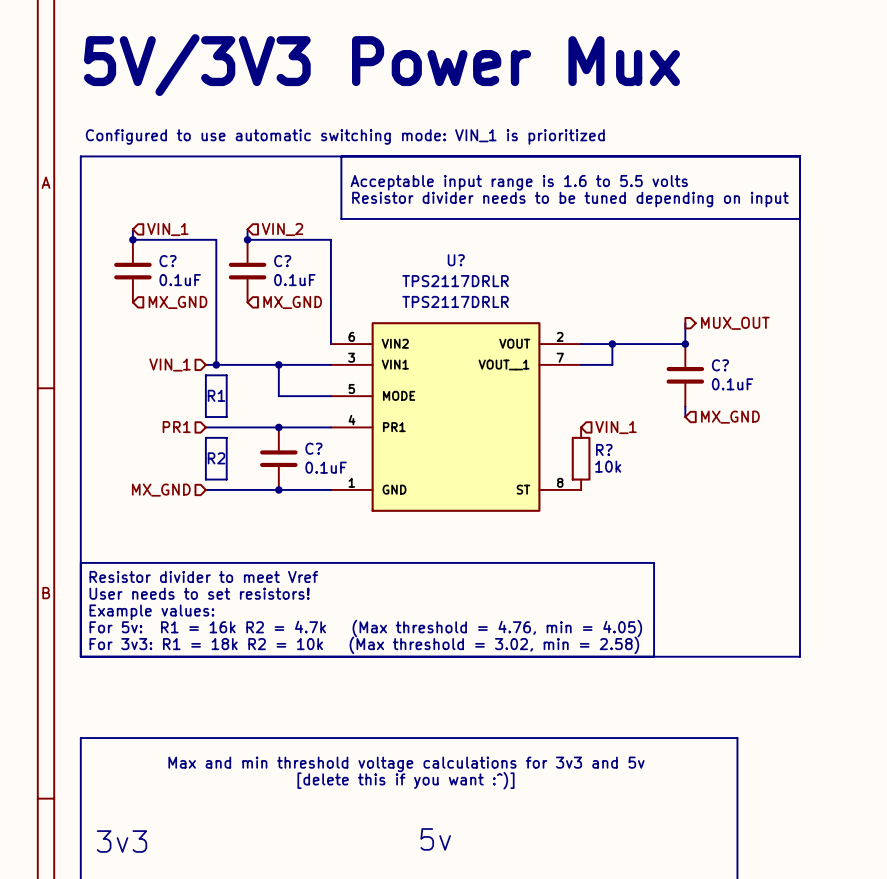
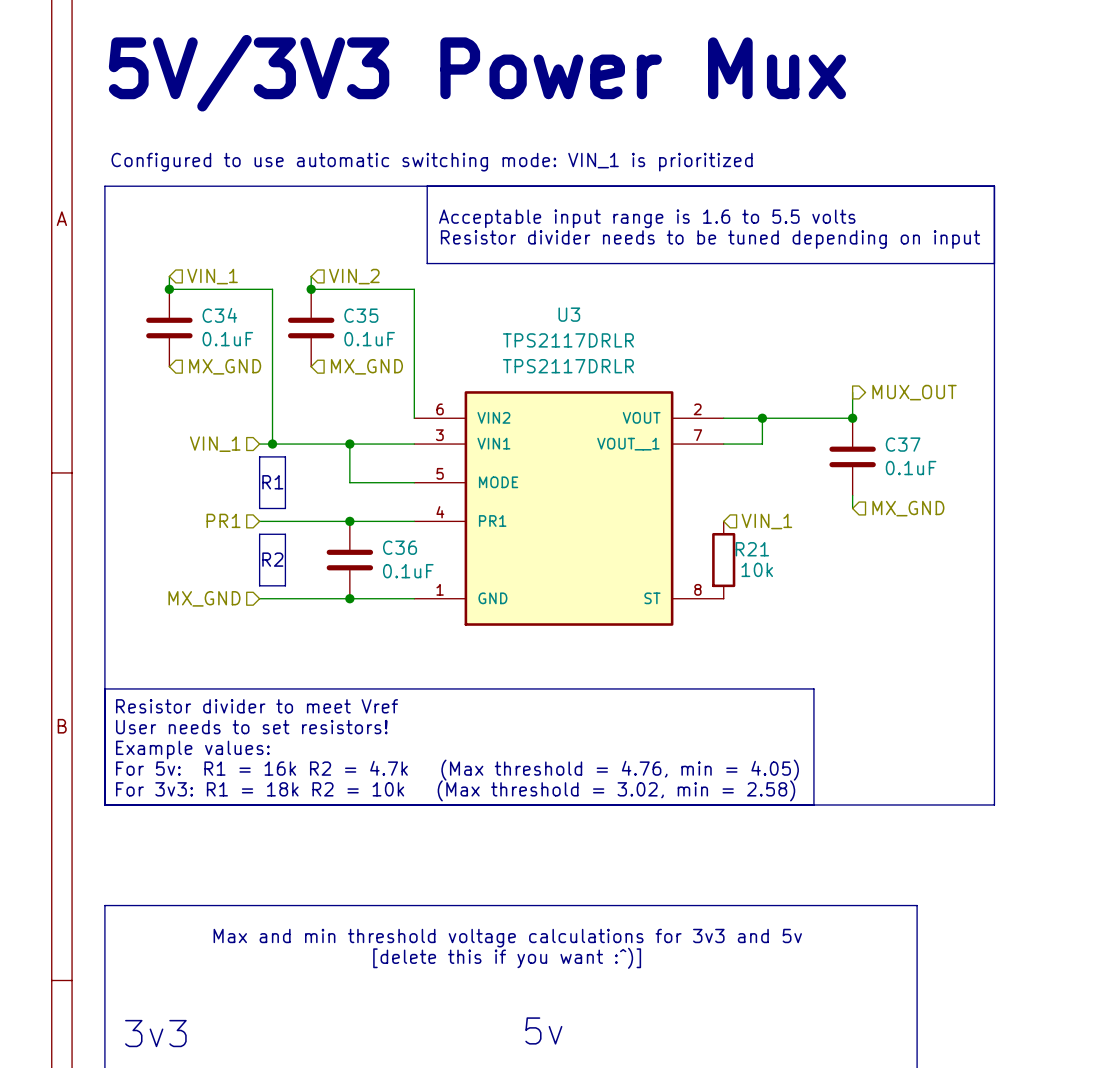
U? name: U? (456, 260) -> U3 (569, 314)
C? name: C? (168, 261) -> C34 (219, 315)
C? name: C? (282, 261) -> C35 (361, 315)
C? name: C? (720, 365) -> C37 (903, 444)
C? name: C? (313, 448) -> C36 (400, 547)
R? name: R? (604, 449) -> R21 (752, 549)

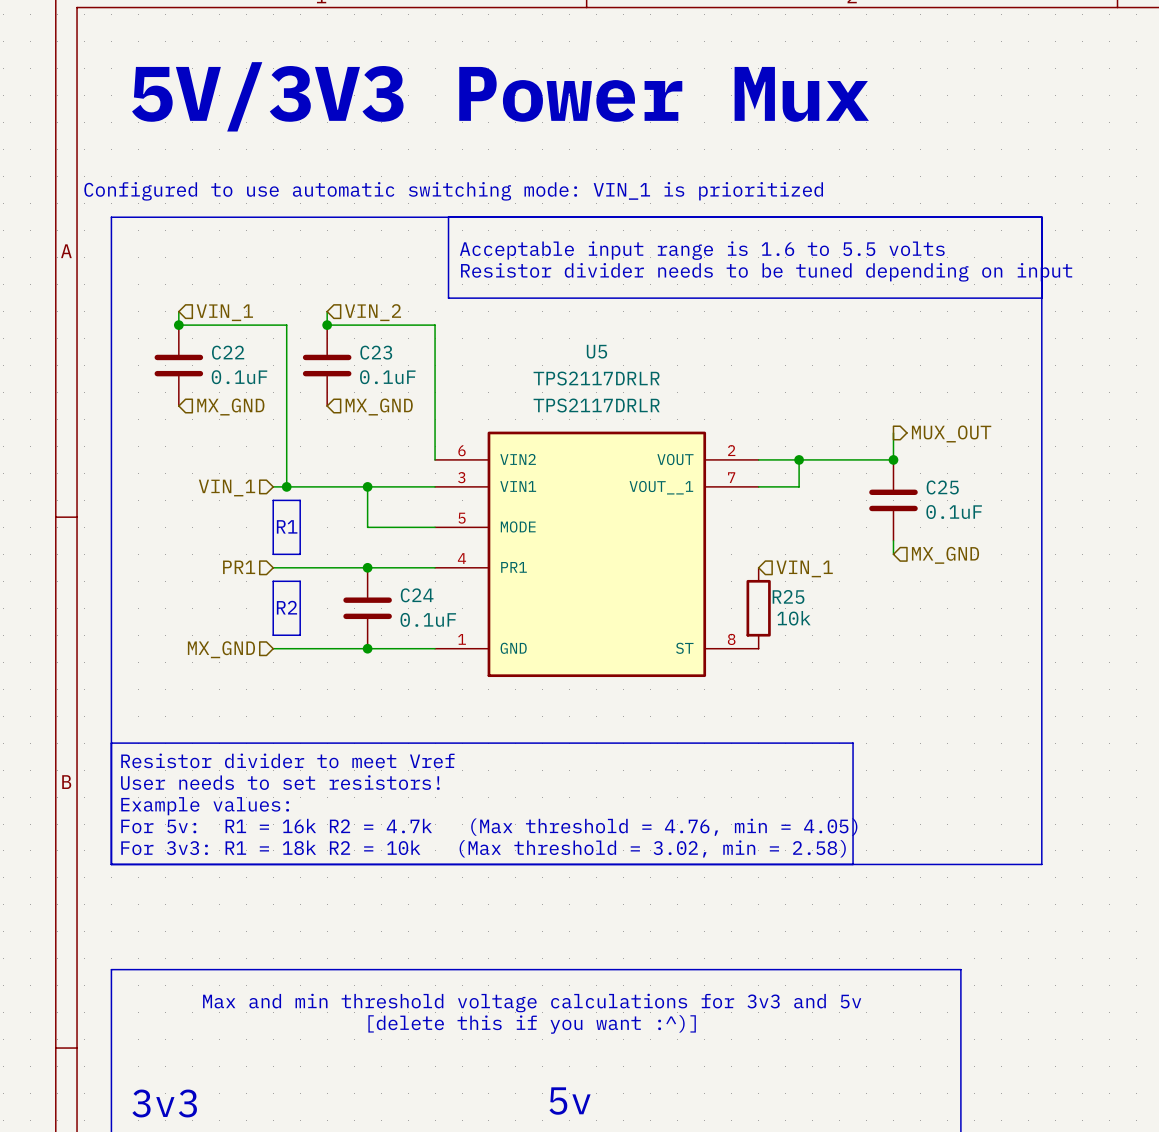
U3 name: U3 (569, 314) -> U5 (596, 351)
C34 name: C34 (219, 315) -> C22 (228, 352)
C35 name: C35 (361, 315) -> C23 (376, 352)
C37 name: C37 (903, 444) -> C25 (942, 487)
C36 name: C36 (400, 547) -> C24 (417, 595)
R21 name: R21 (752, 549) -> R25 (788, 596)

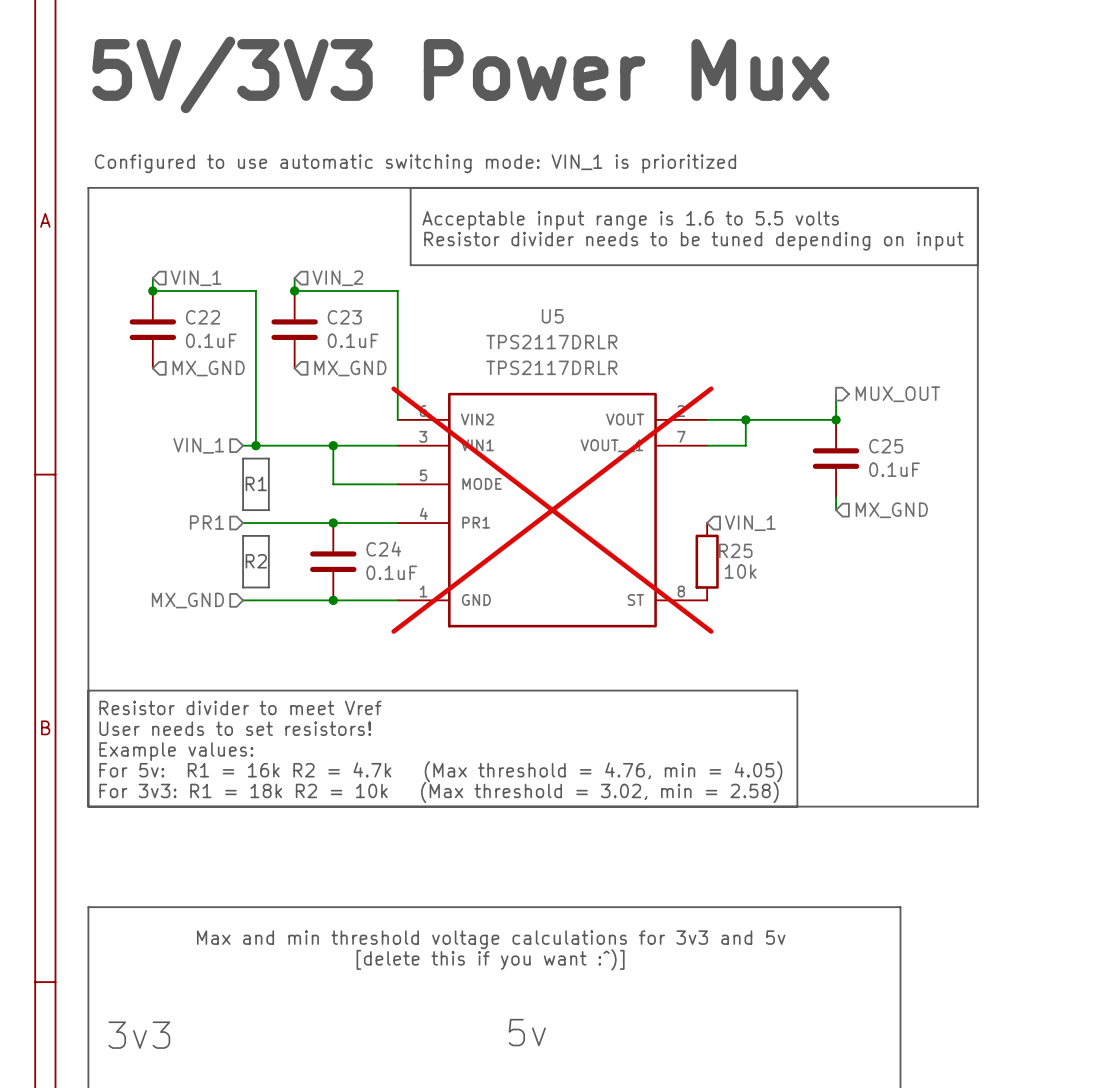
U5 do-not-place cross: none -> (552, 510)

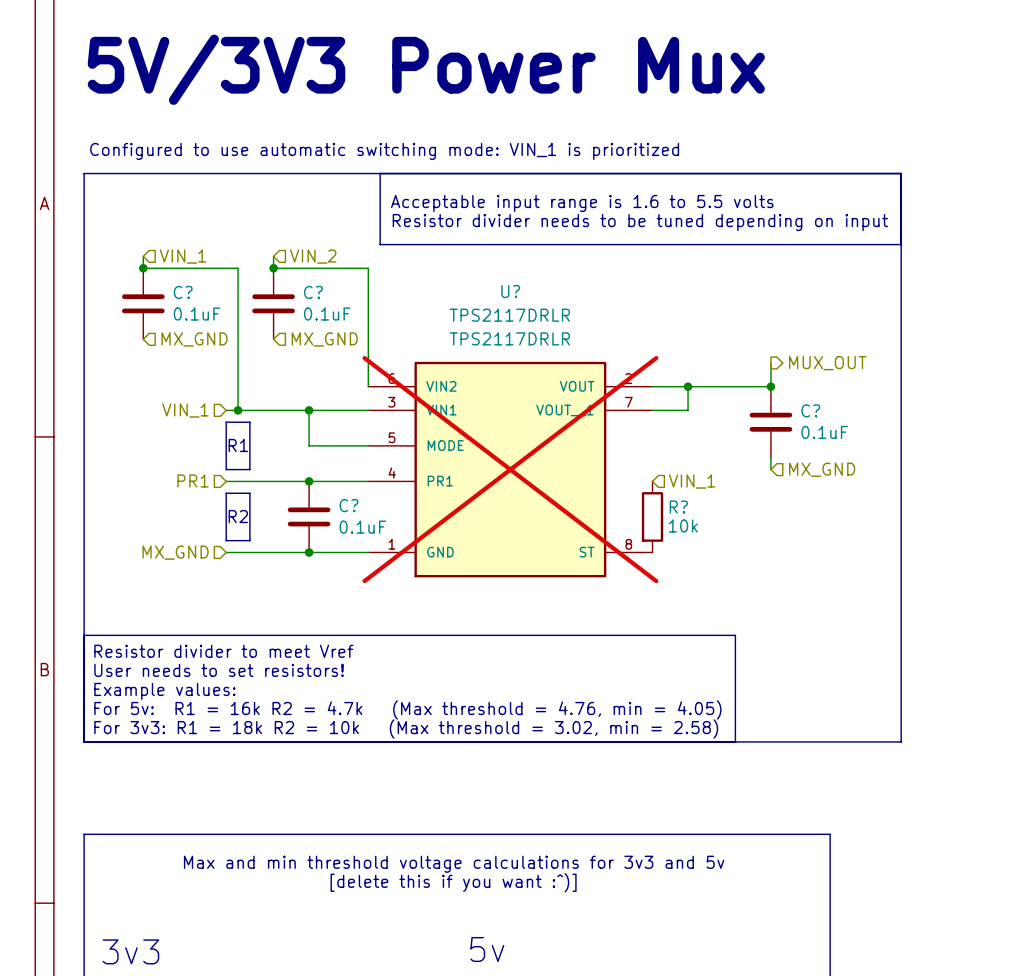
U5 name: U5 (552, 316) -> U? (510, 291)
C22 name: C22 (203, 317) -> C? (183, 292)
C23 name: C23 (344, 317) -> C? (313, 292)
C25 name: C25 (886, 446) -> C? (810, 410)
C24 name: C24 (383, 549) -> C? (348, 505)
R25 name: R25 (735, 550) -> R? (678, 507)

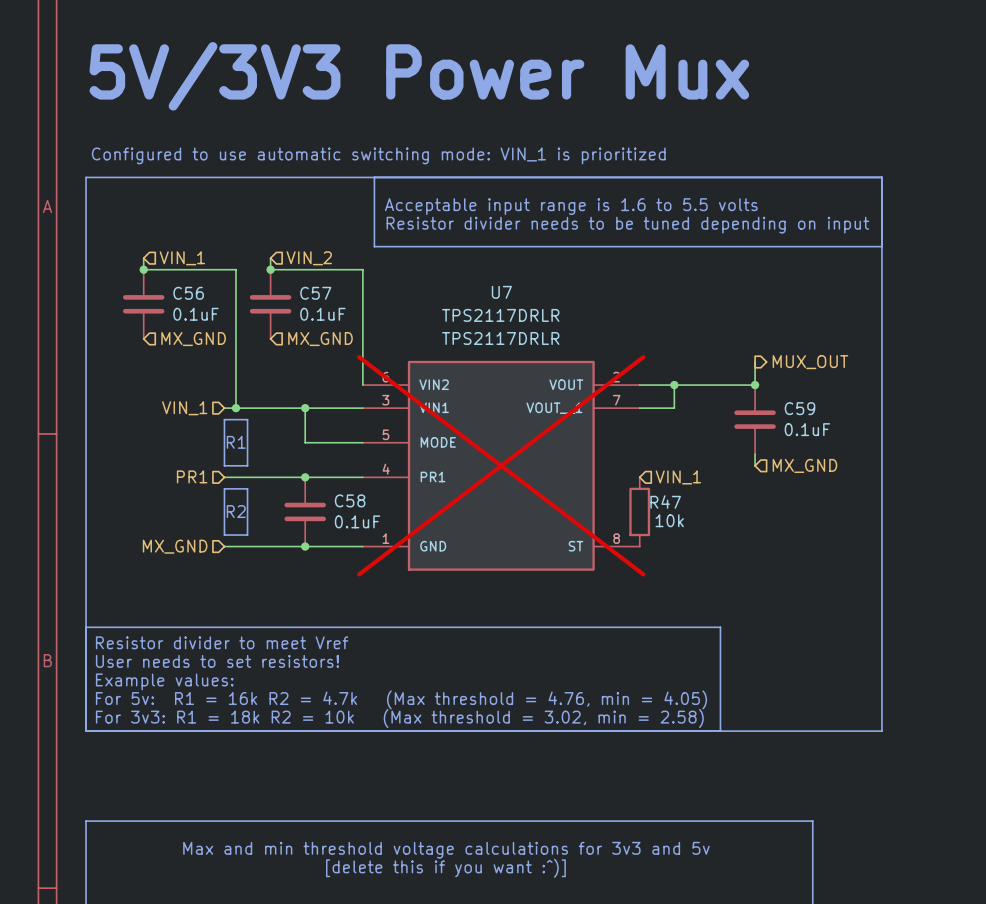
U? name: U? (510, 291) -> U7 (501, 292)
C? name: C? (183, 292) -> C56 (188, 293)
C? name: C? (313, 292) -> C57 (315, 293)
C? name: C? (810, 410) -> C59 (799, 408)
C? name: C? (348, 505) -> C58 (350, 500)
R? name: R? (678, 507) -> R47 (665, 502)

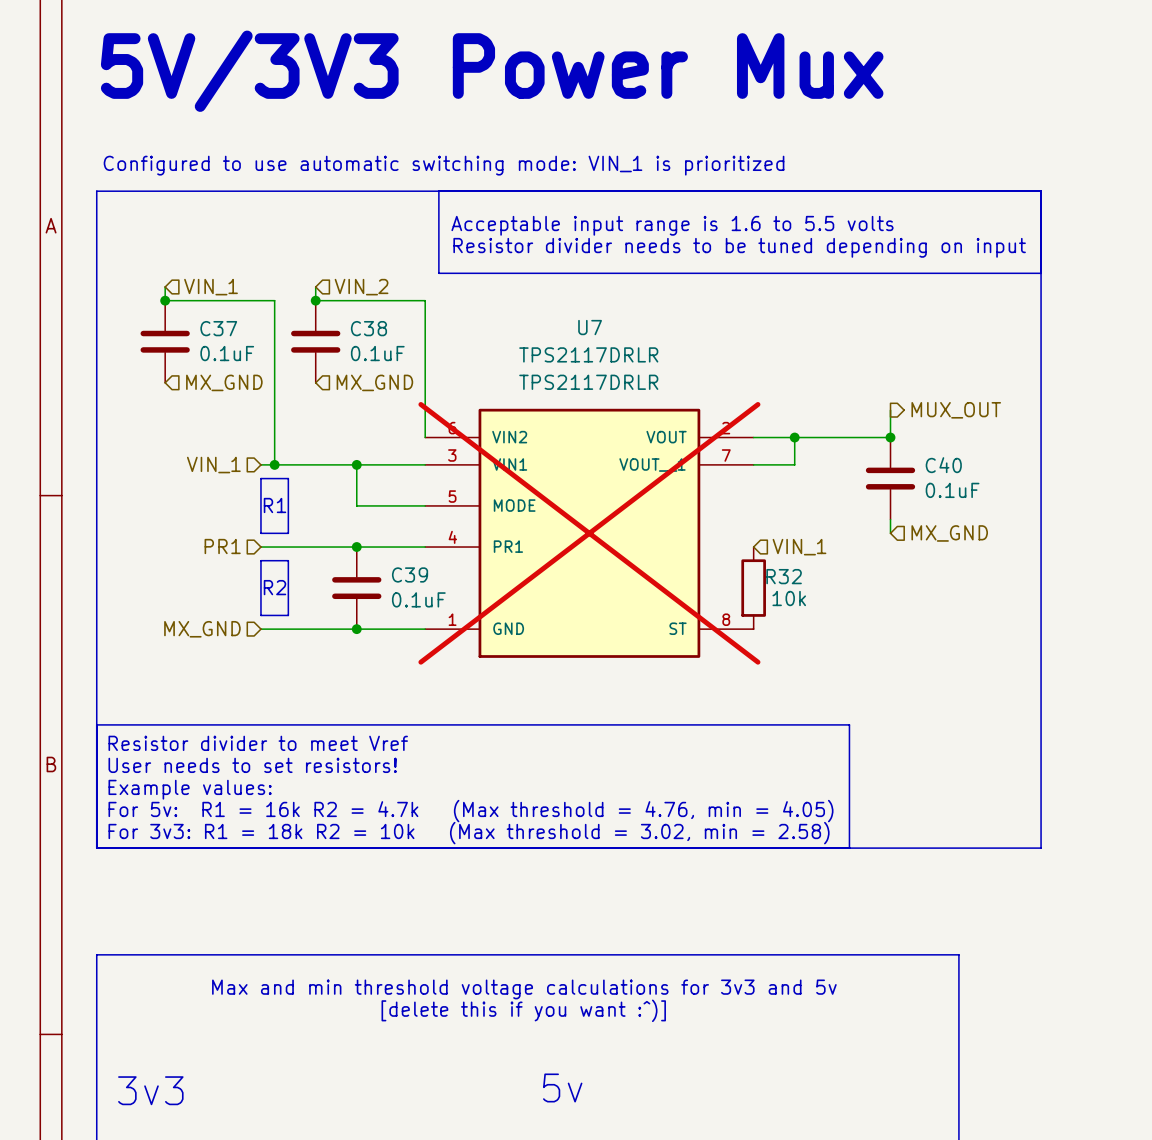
C56 name: C56 (188, 293) -> C37 (218, 328)
C57 name: C57 (315, 293) -> C38 (368, 328)
C59 name: C59 (799, 408) -> C40 (943, 465)
C58 name: C58 (350, 500) -> C39 (410, 574)
R47 name: R47 (665, 502) -> R32 (784, 576)

